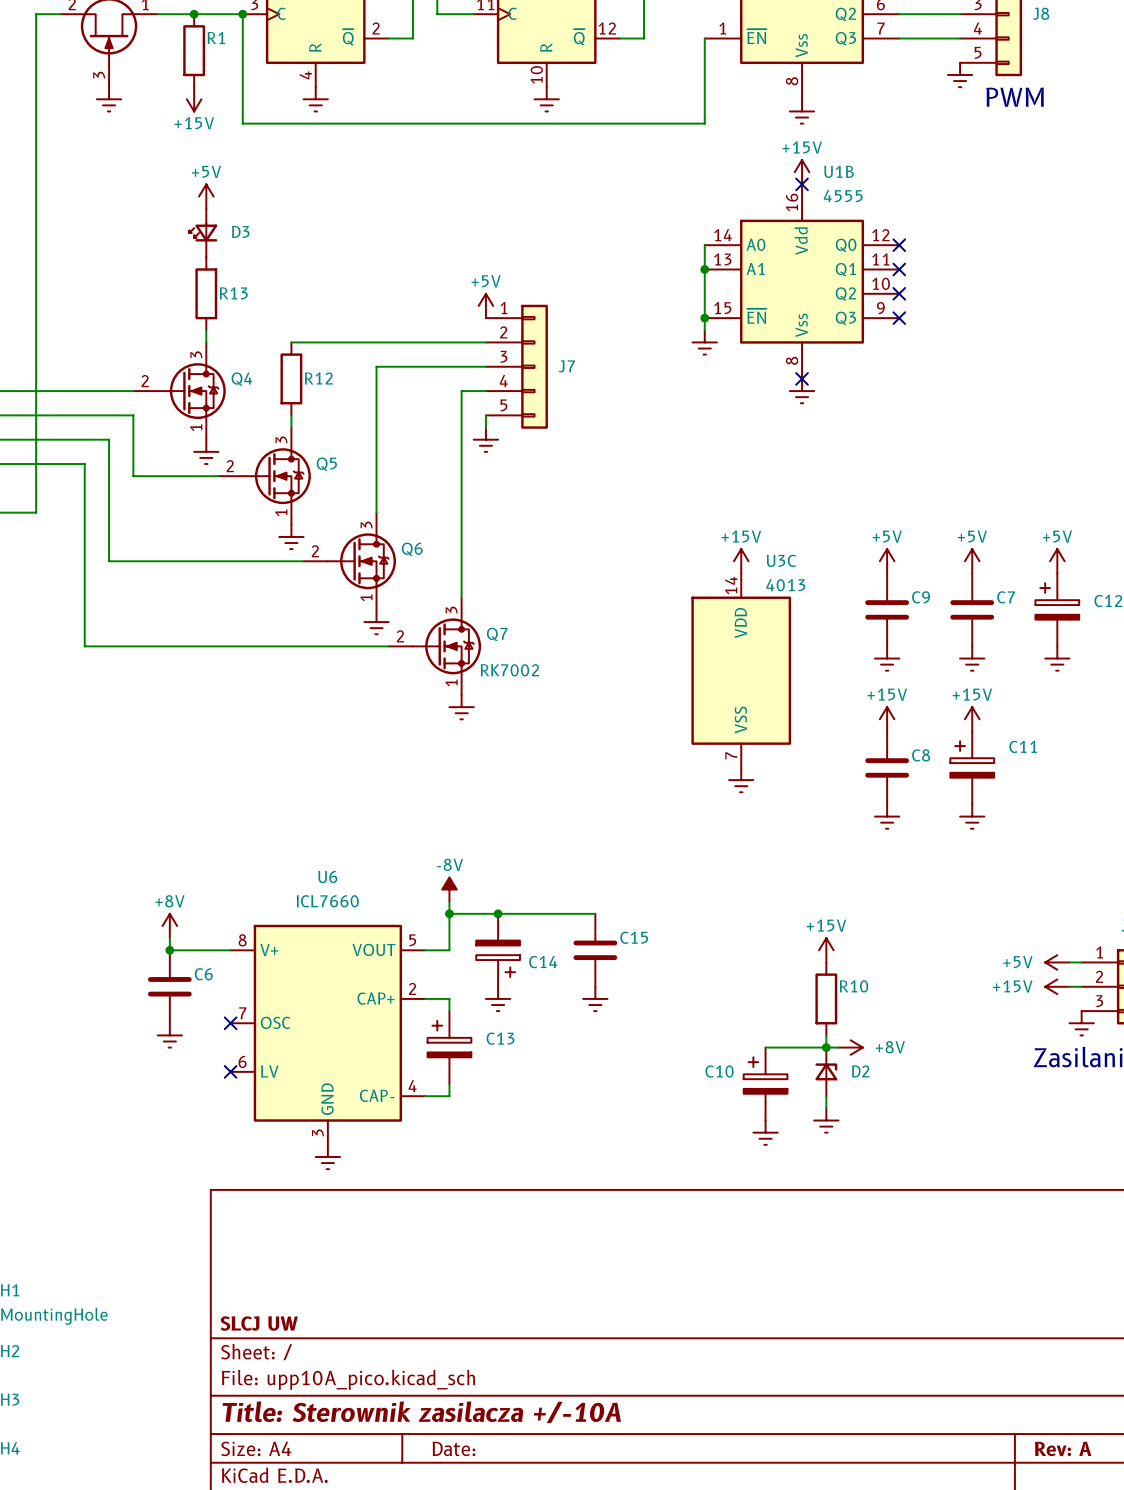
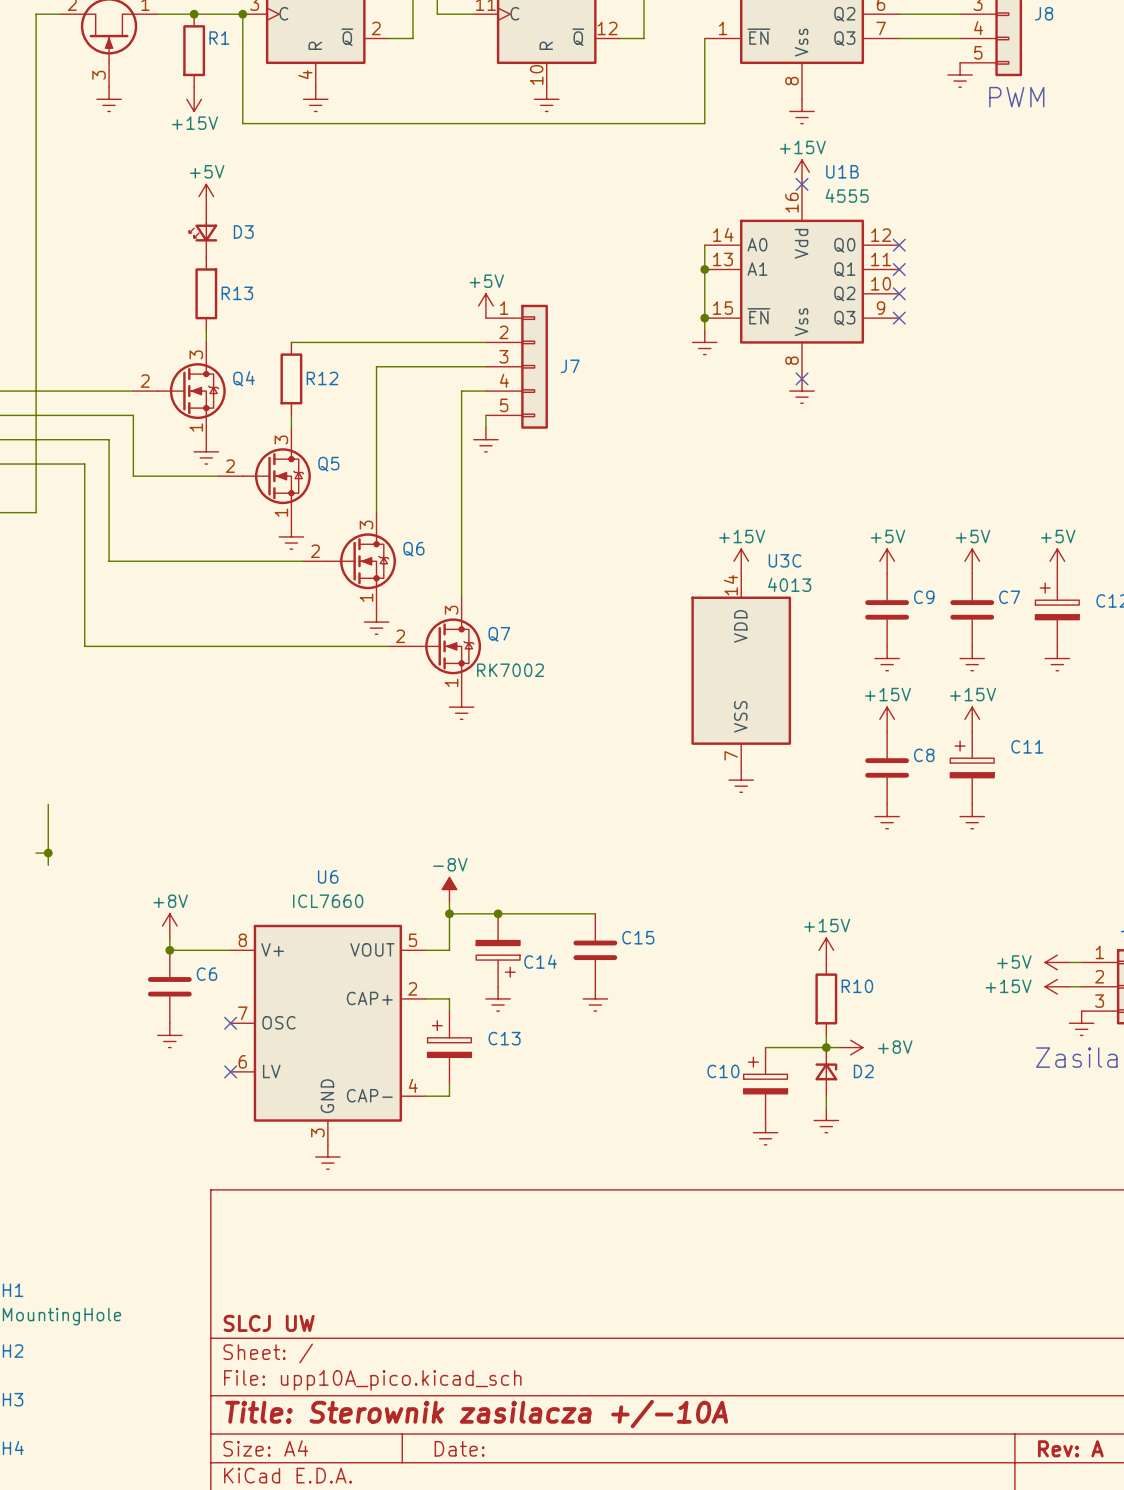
wire: none -> (48, 804) (48, 865)
wire: none -> (36, 853) (48, 853)
junction: none -> (48, 853)

